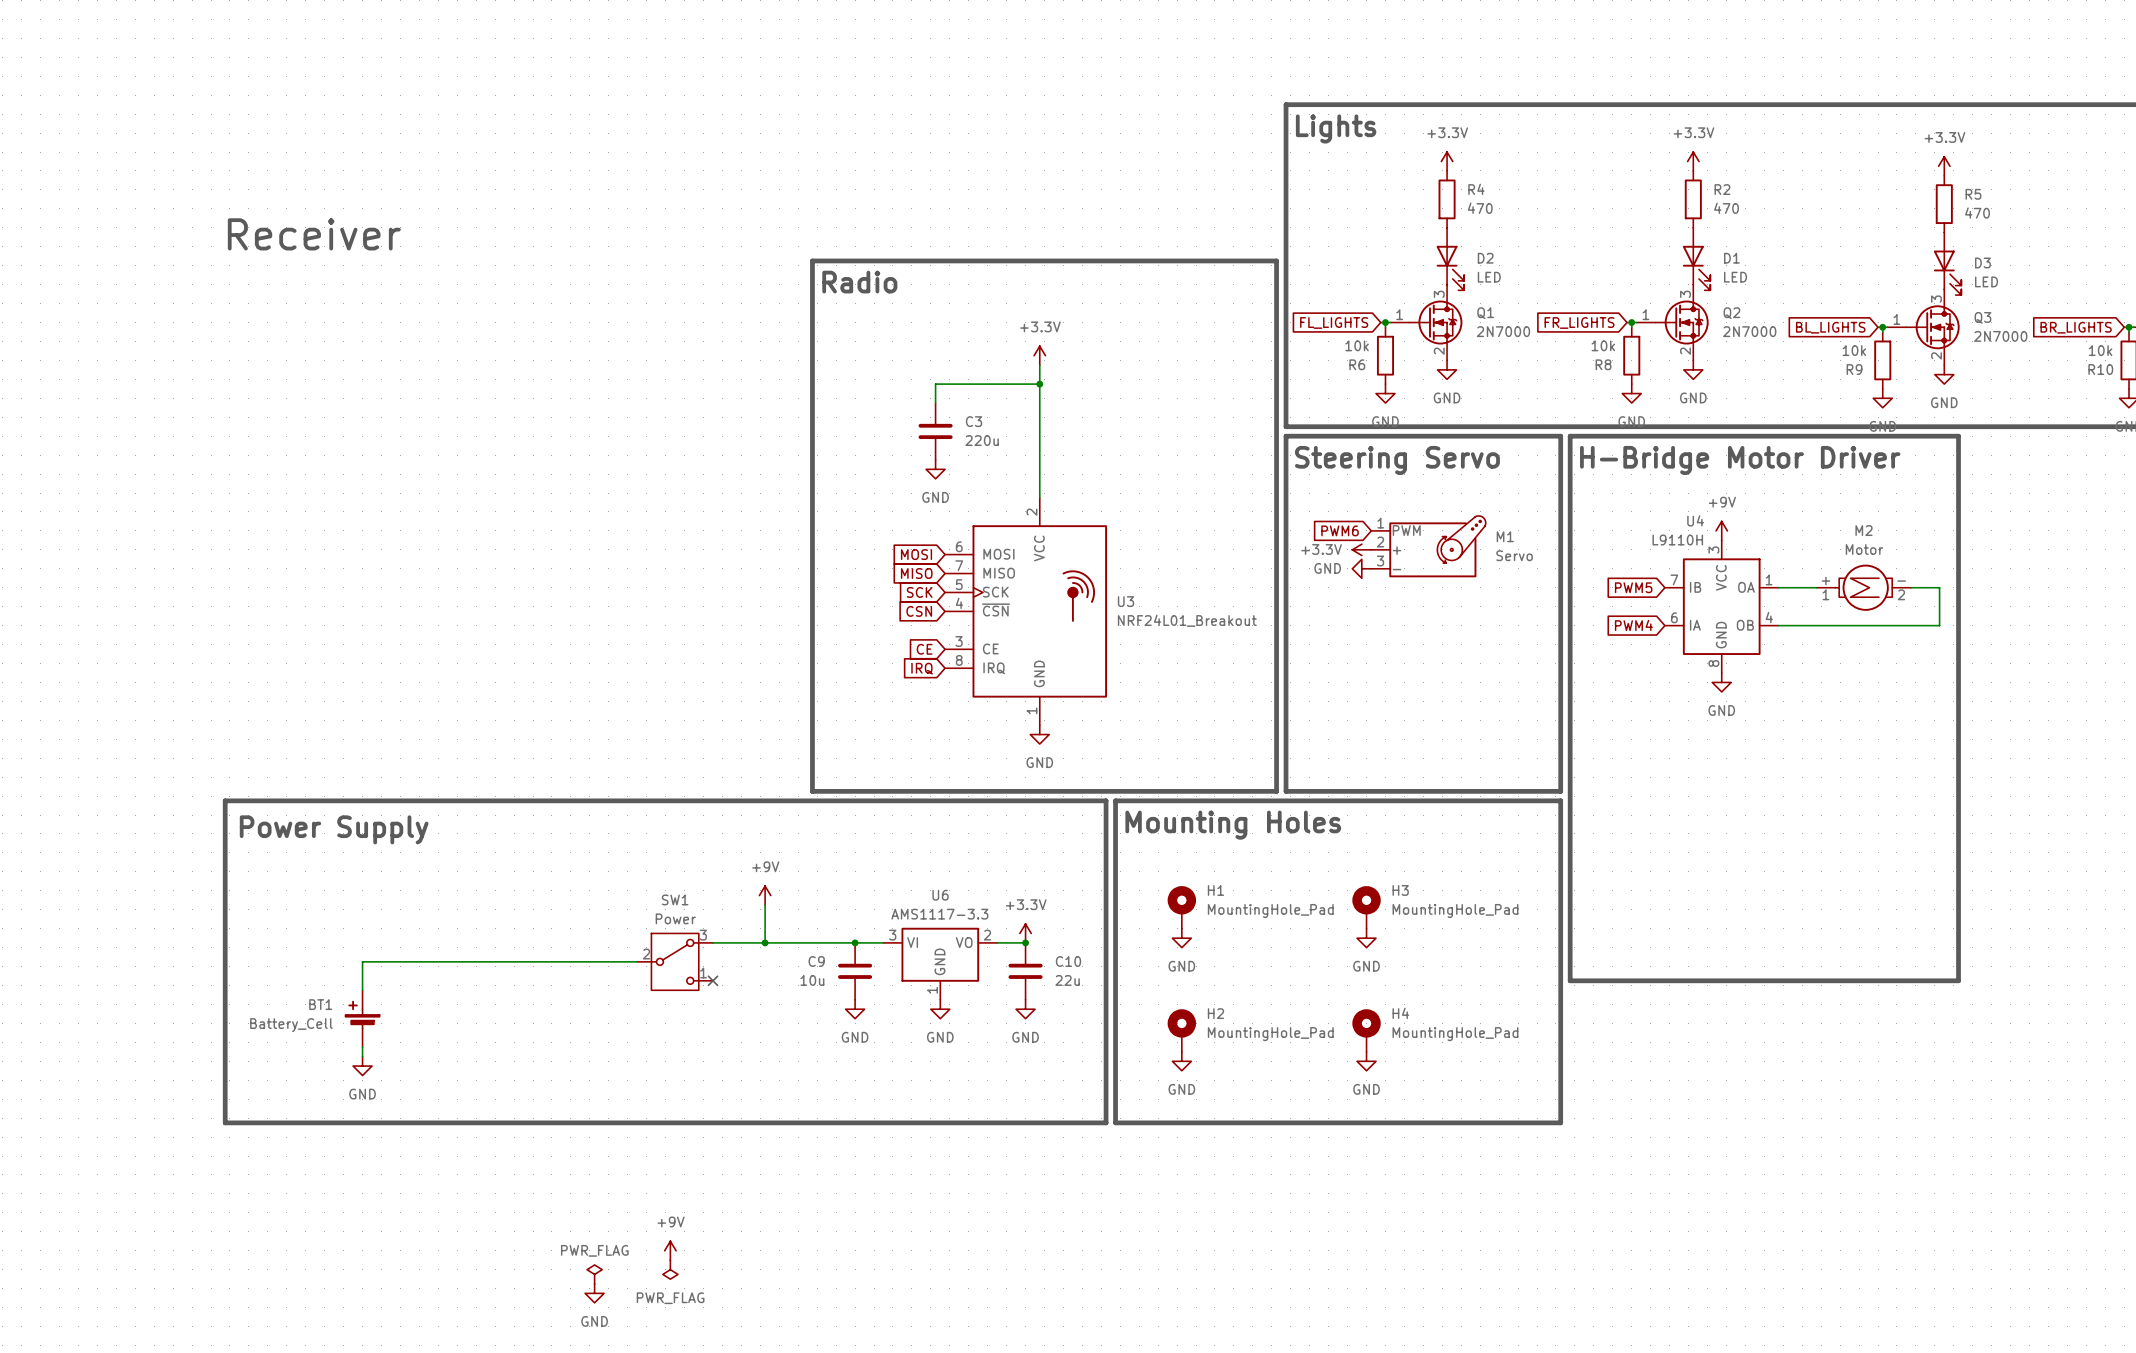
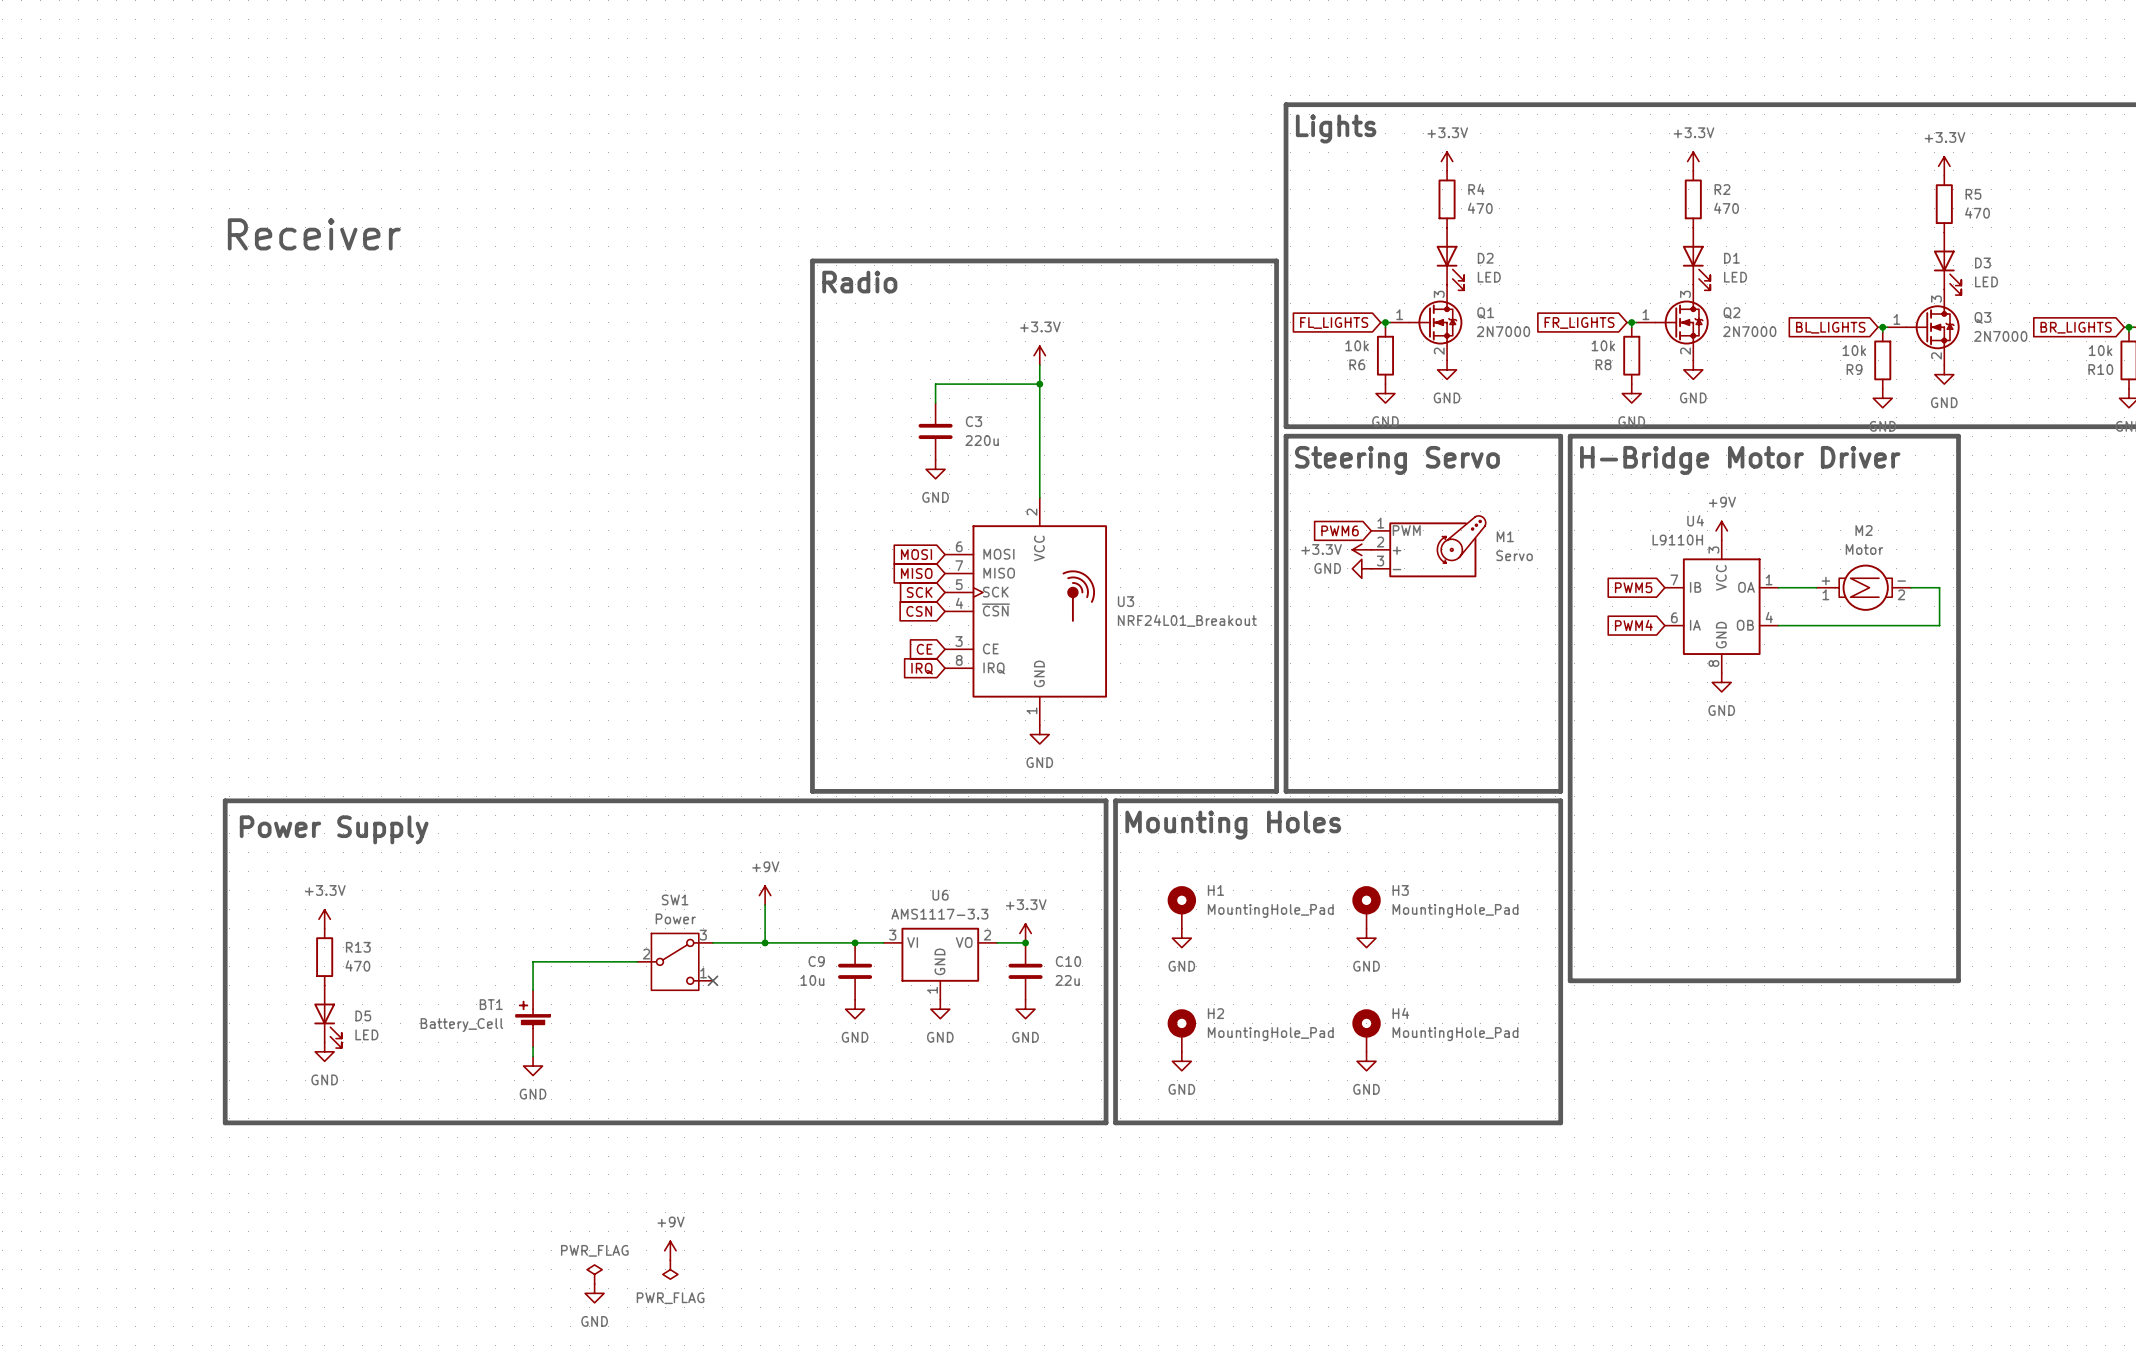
power symbol: none -> +3.3V (324, 919)
R13: none -> 470 (324, 957)
wire: (533, 961) (362, 961) (362, 990) -> (533, 961) (533, 990)
D5: none -> LED (327, 1016)
BT1 position: (362, 1018) -> (533, 1018)
wire: (362, 1047) (362, 1056) -> (533, 1047) (533, 1056)
power symbol position: GND (362, 1066) -> GND (324, 1051)
power symbol: none -> GND (533, 1066)

